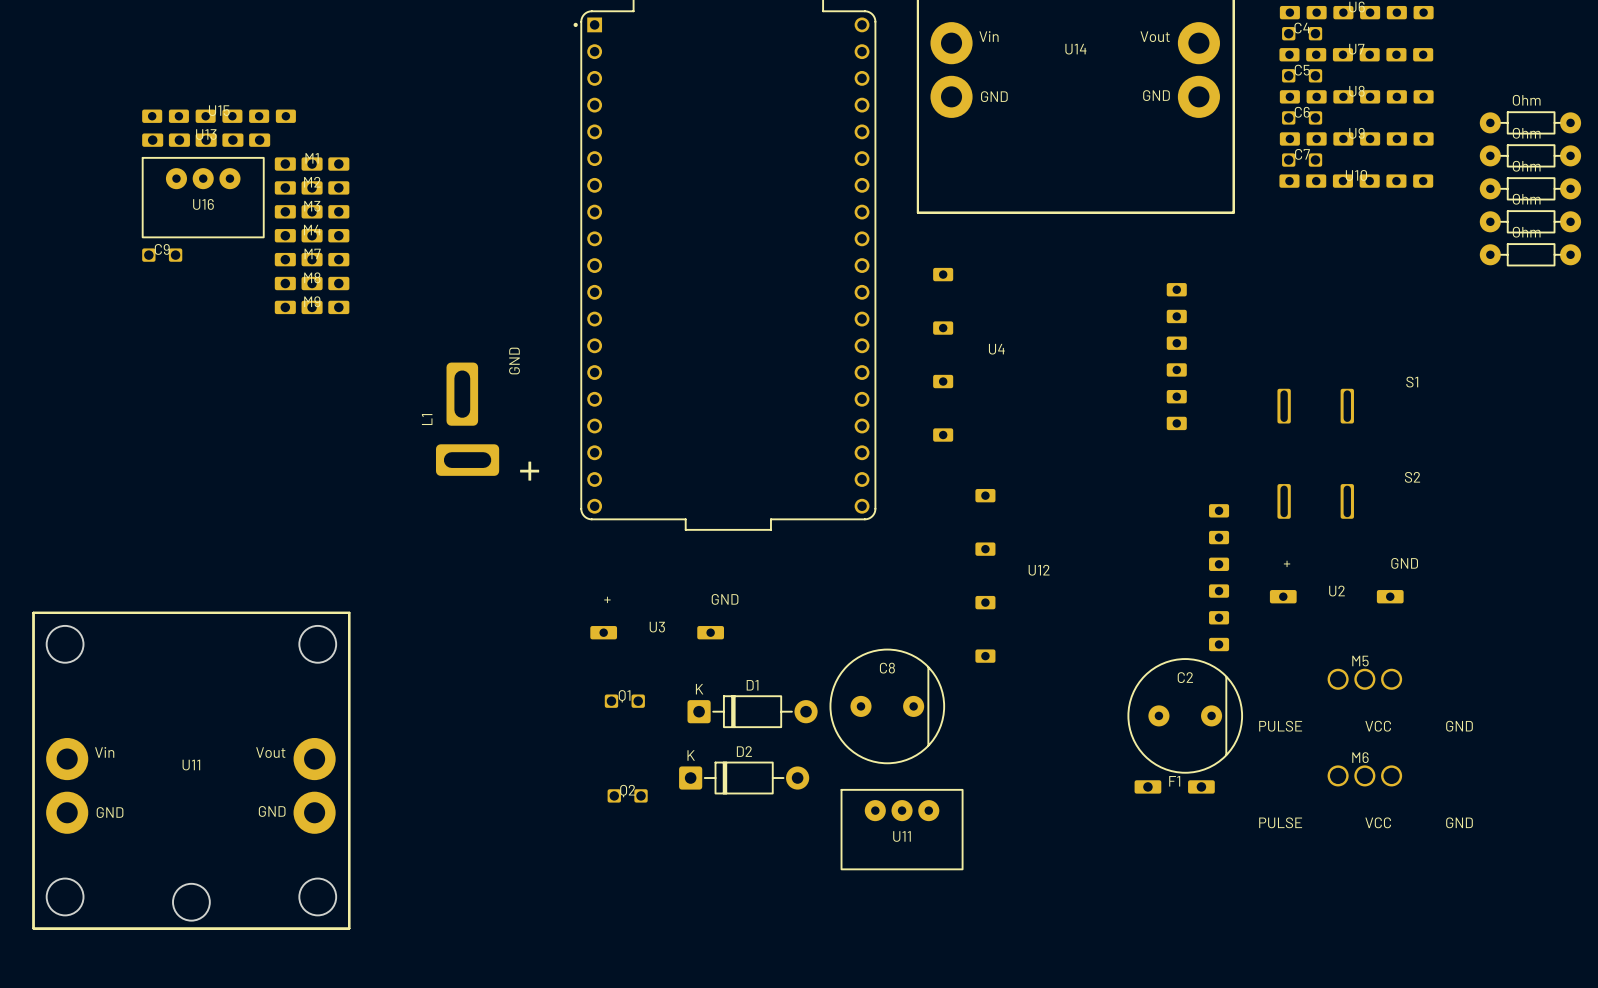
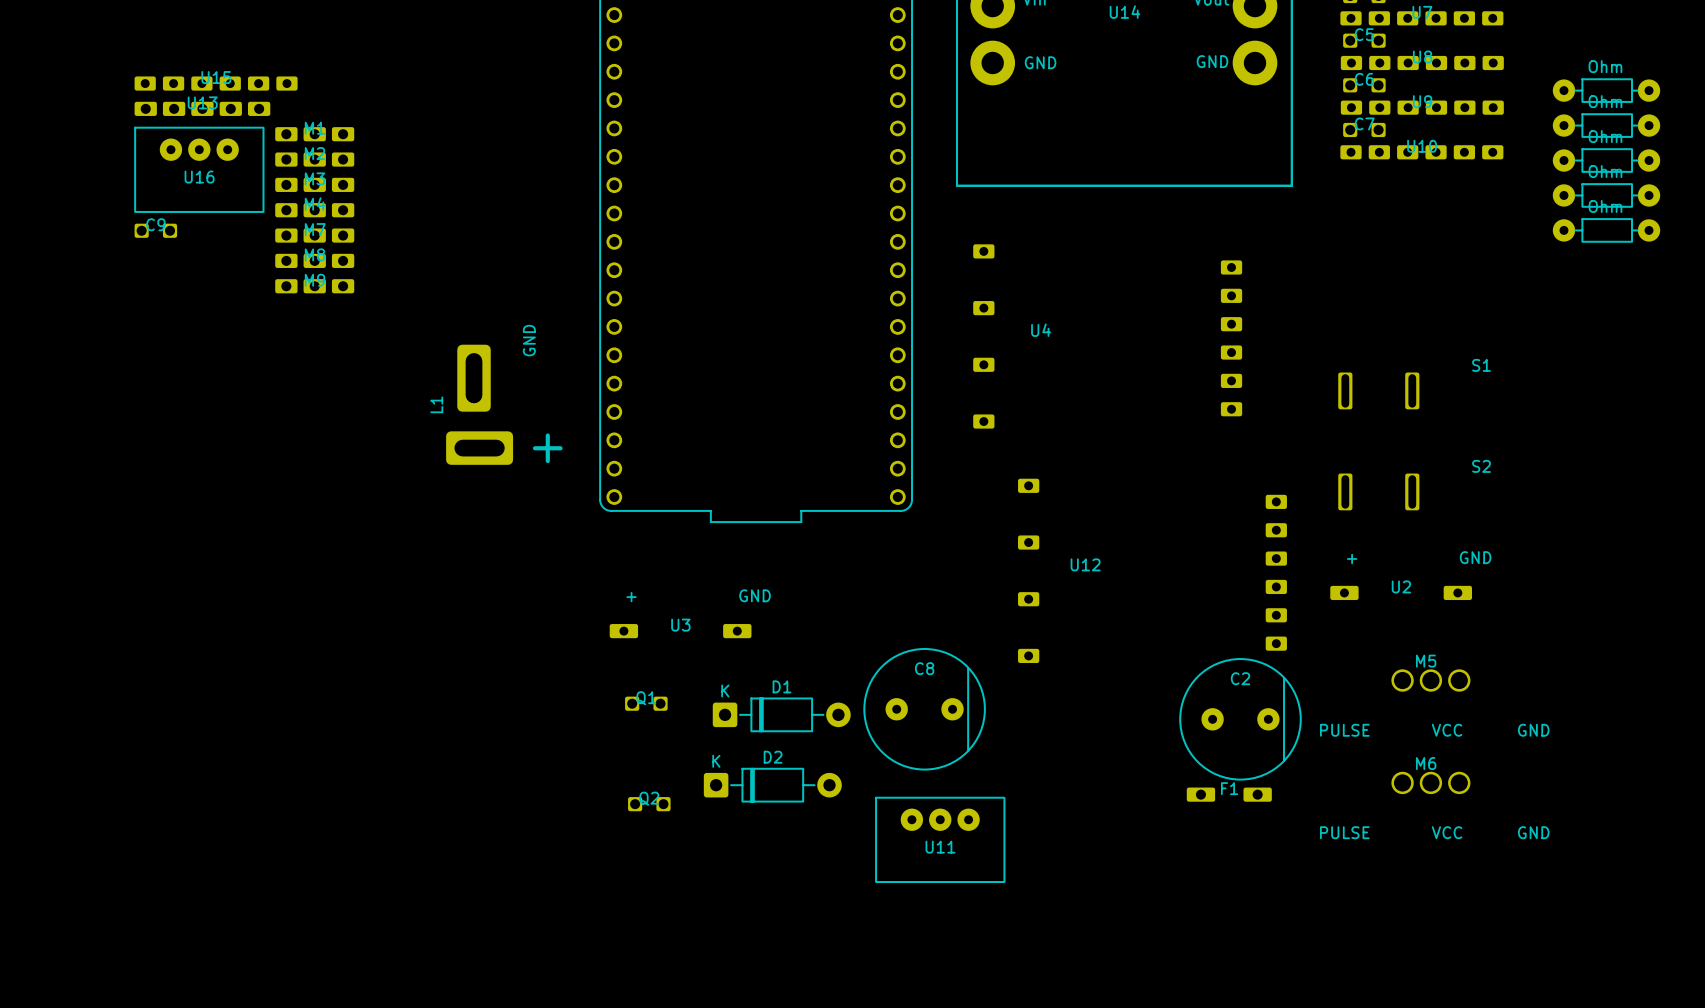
U11: (191, 770) -> none

